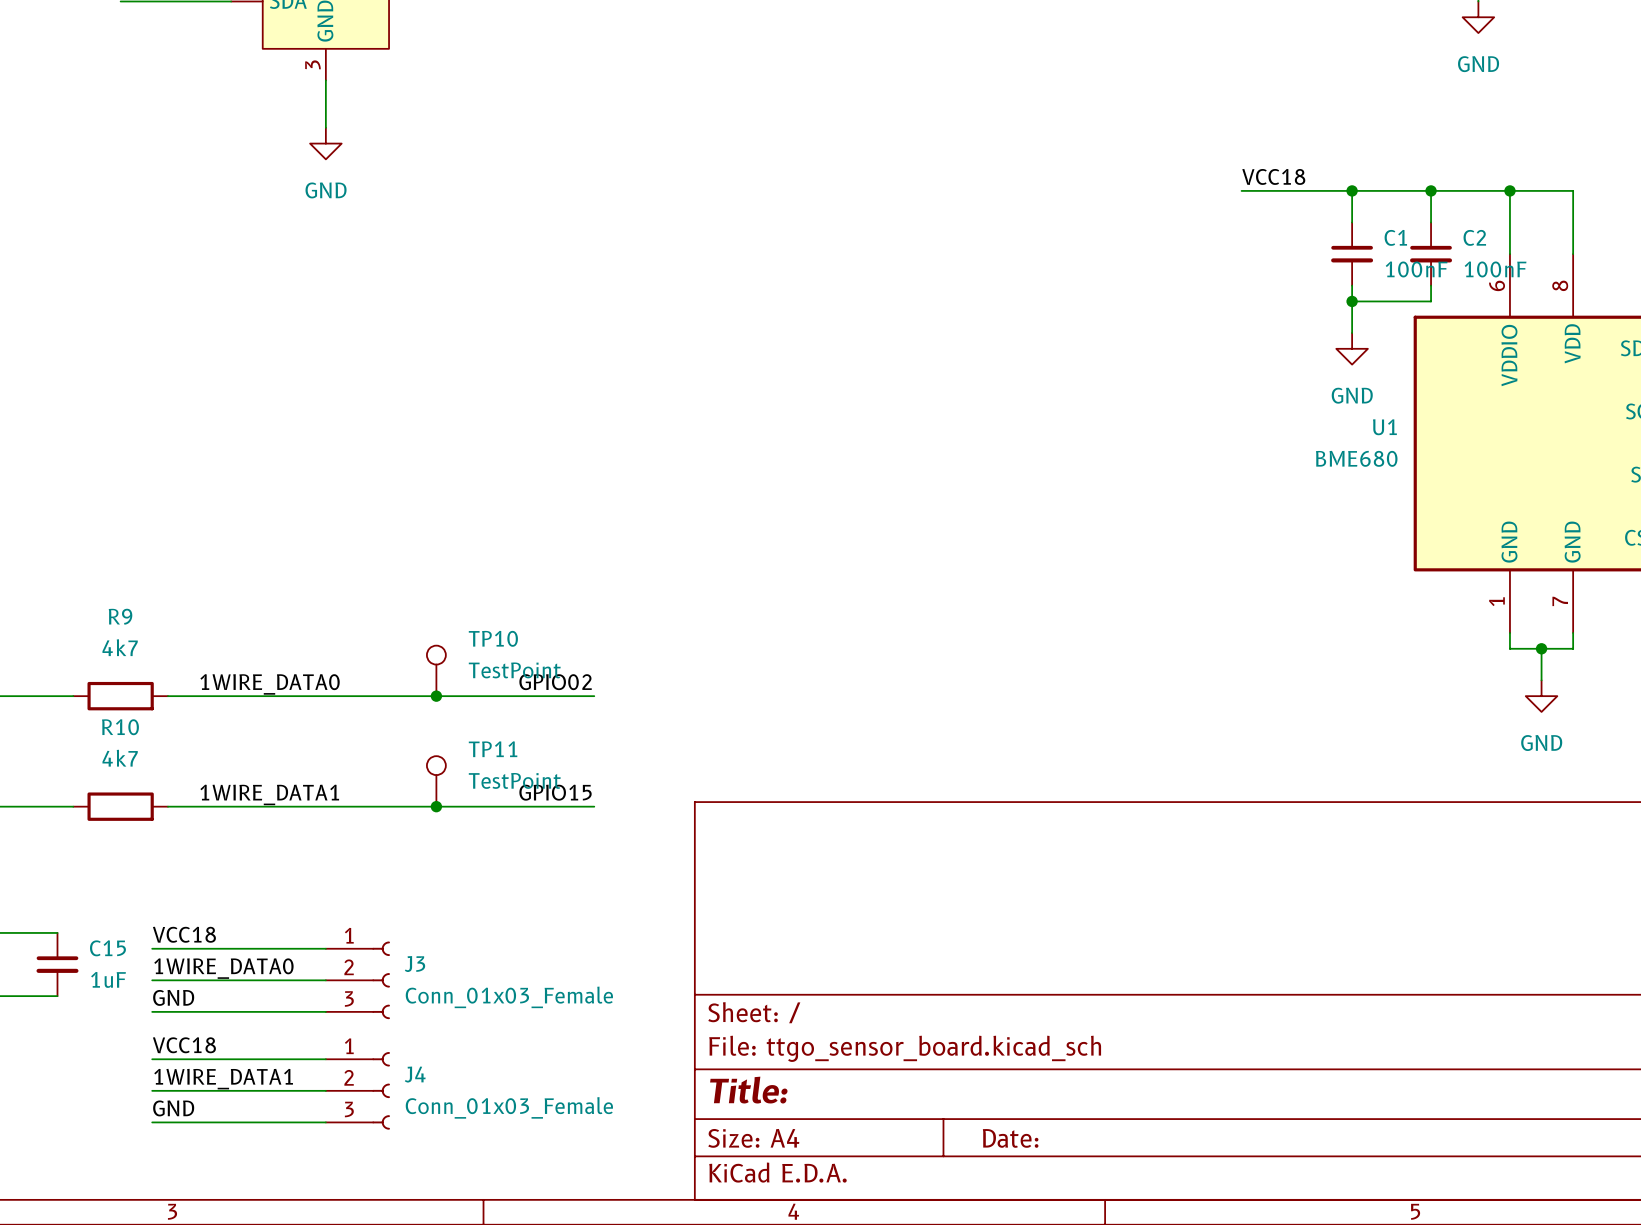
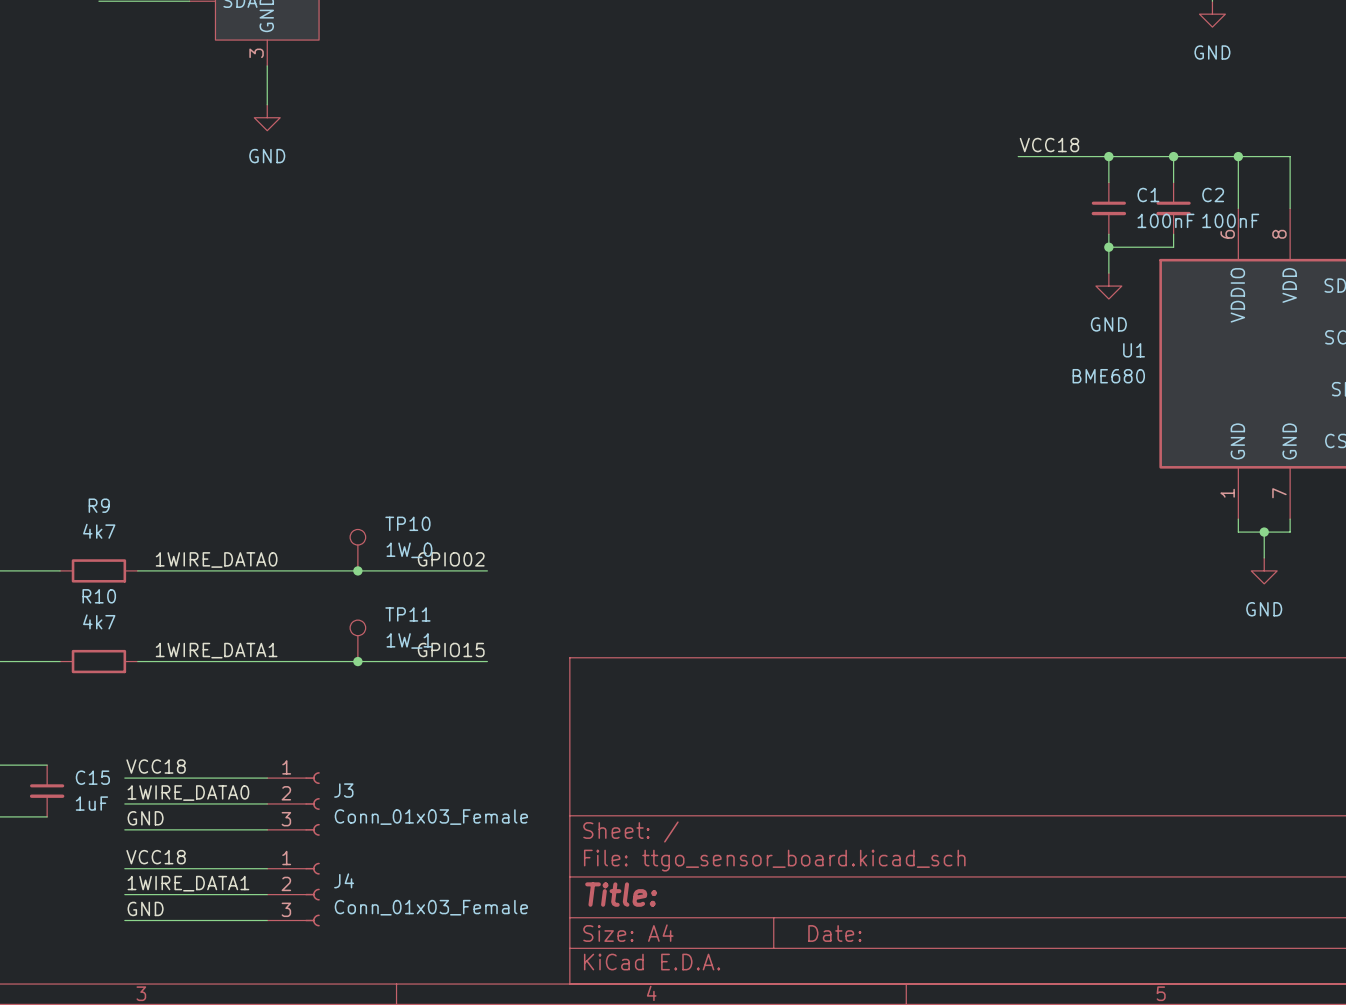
TP10 value: TestPoint (514, 670) -> 1W_0 (409, 550)
TP11 value: TestPoint (514, 780) -> 1W_1 (409, 640)

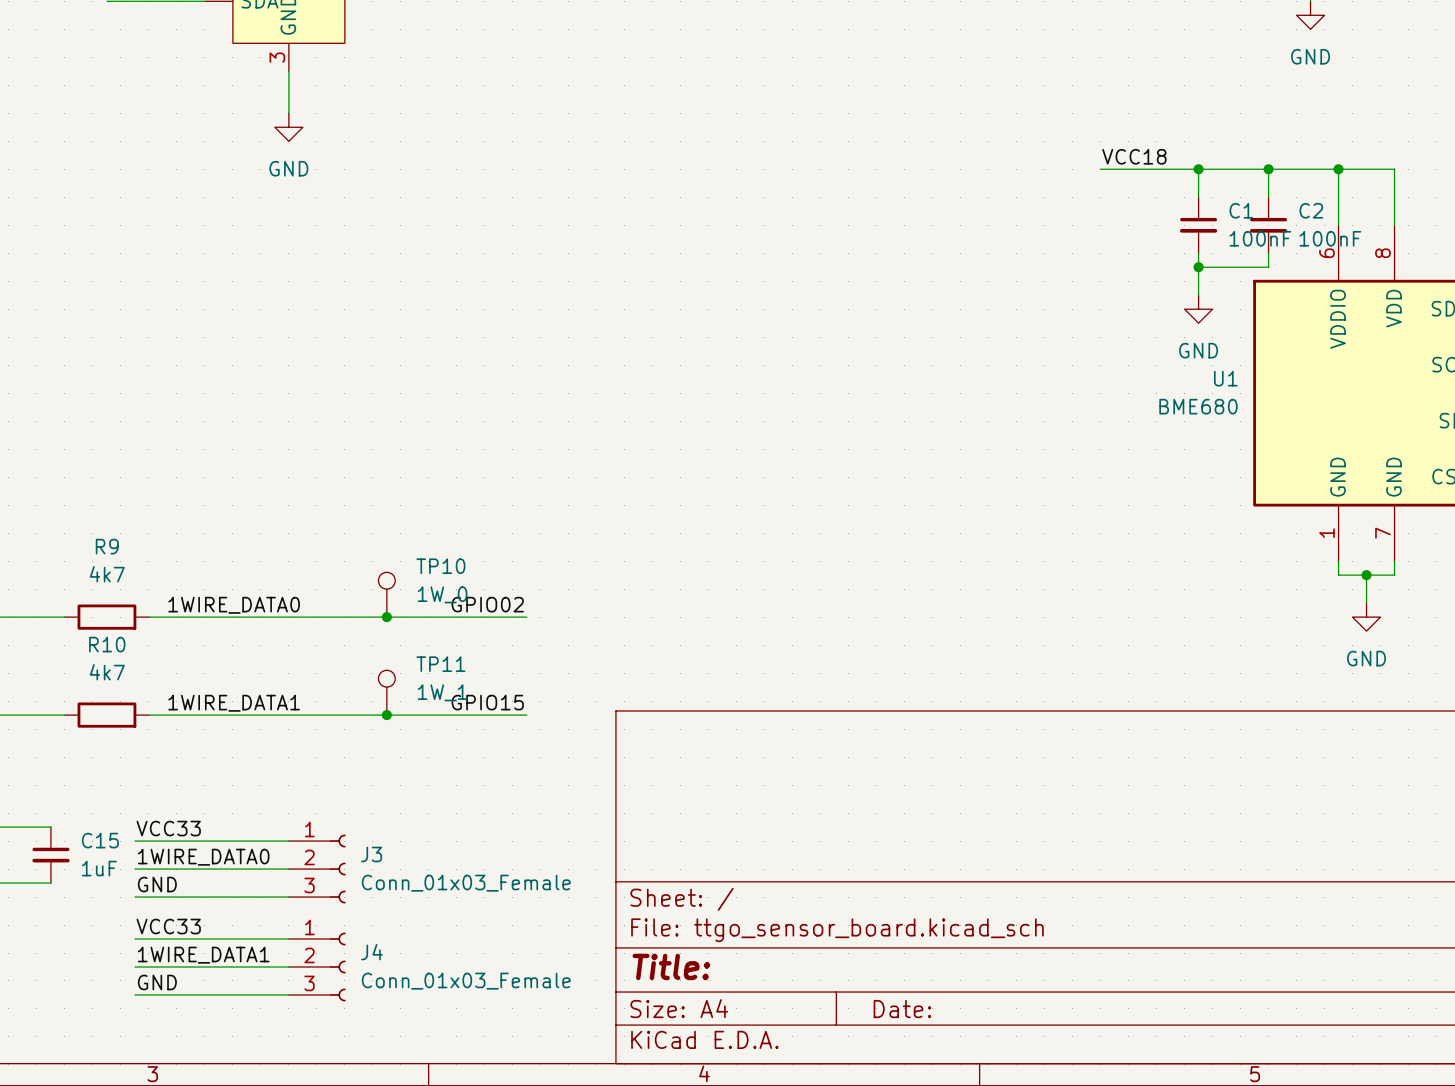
label: VCC18 (156, 766) -> VCC33 (168, 828)
label: VCC18 (156, 857) -> VCC33 (168, 926)

